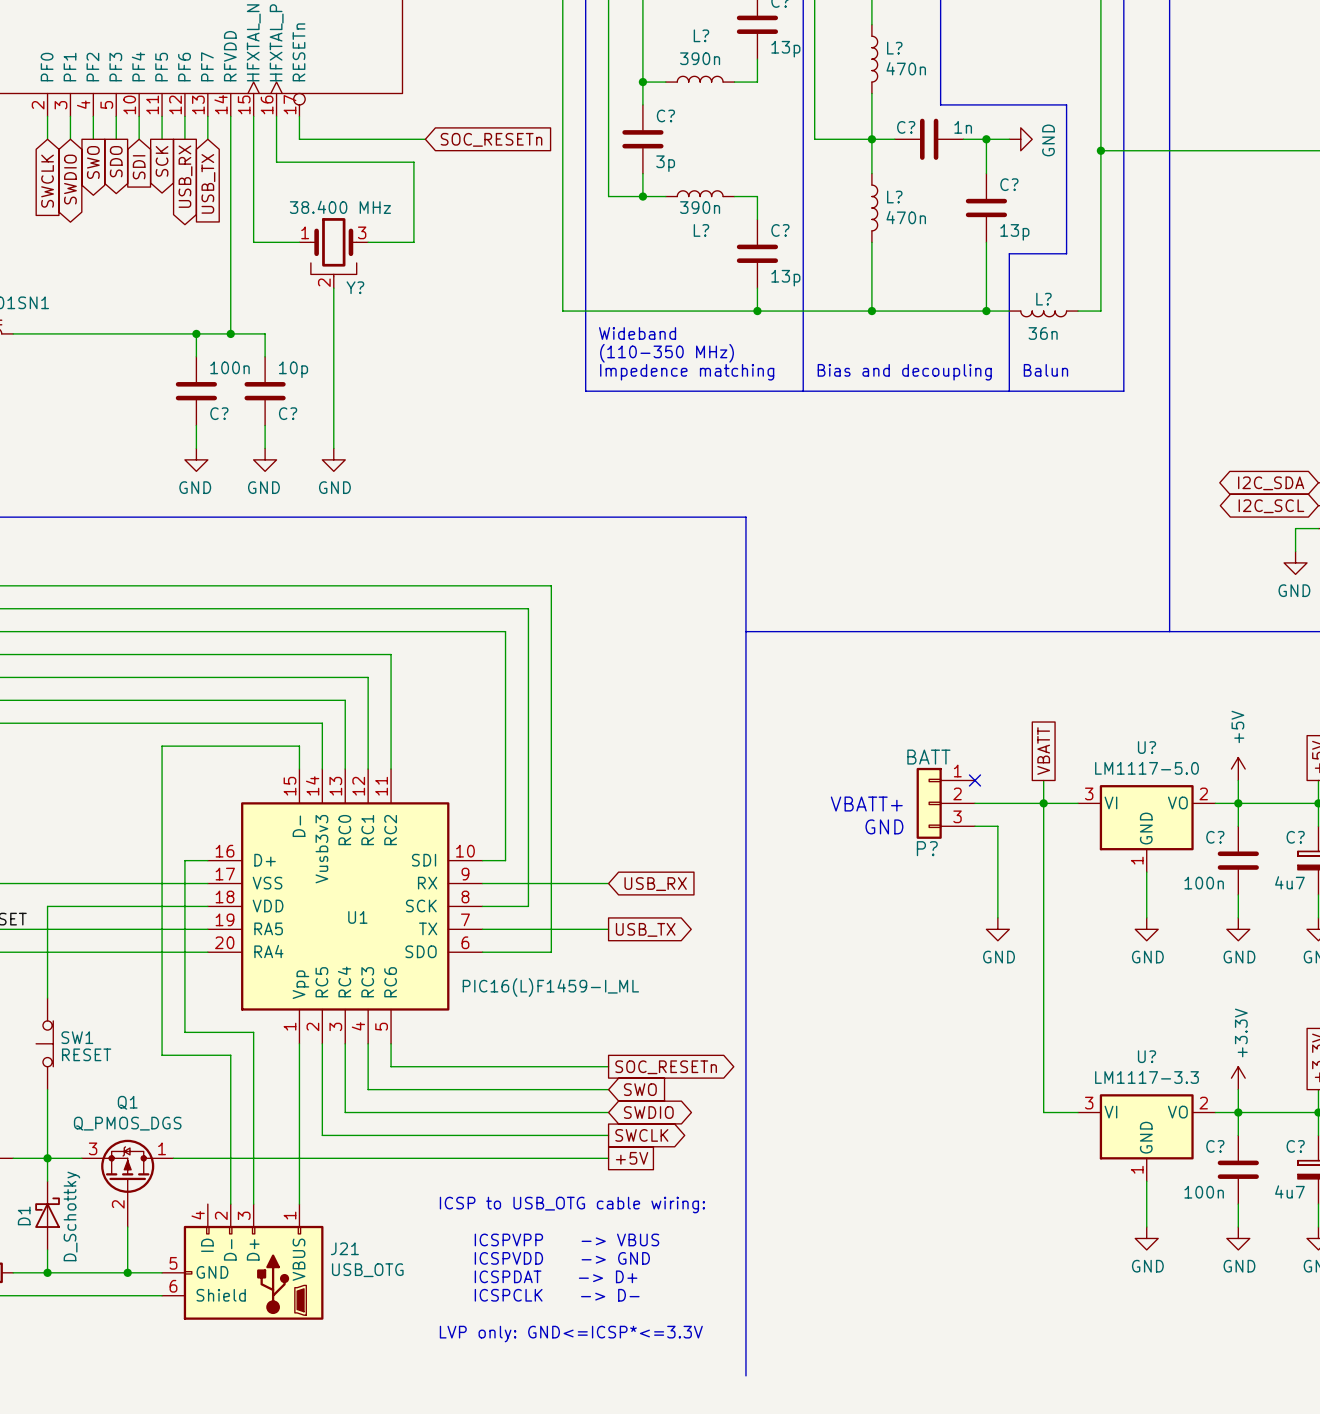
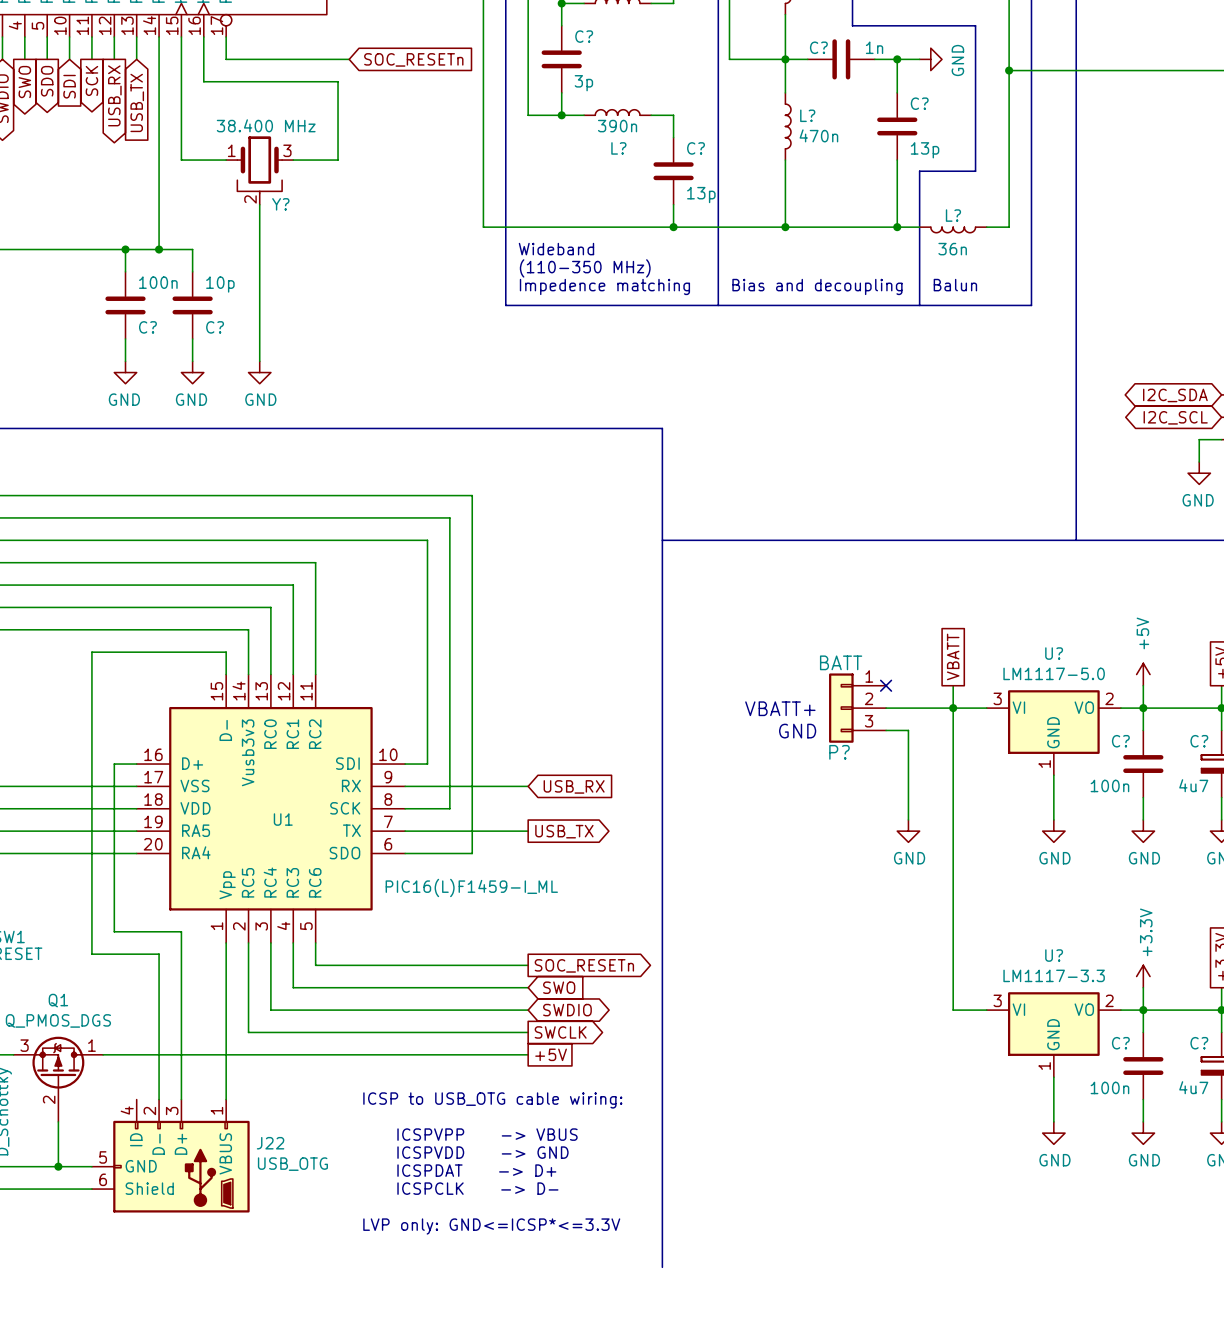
J21 name: J21 (344, 1248) -> J22 (270, 1143)

